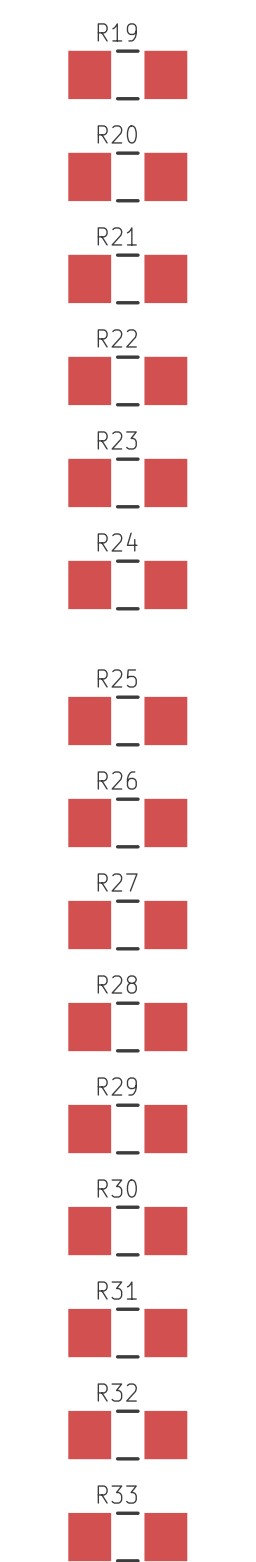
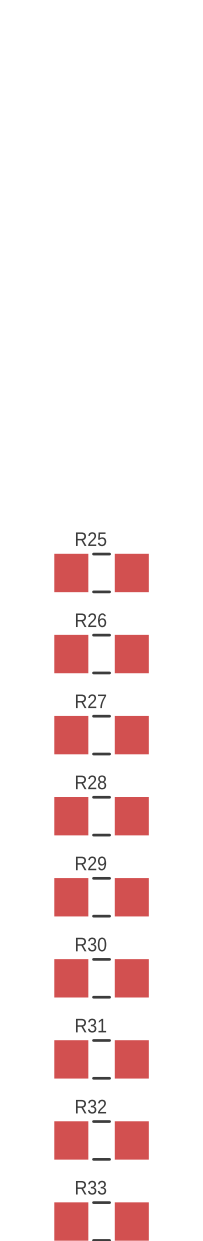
R19: (127, 74) -> none
R20: (127, 176) -> none
R21: (127, 278) -> none
R22: (127, 380) -> none
R23: (127, 482) -> none
R24: (127, 584) -> none

